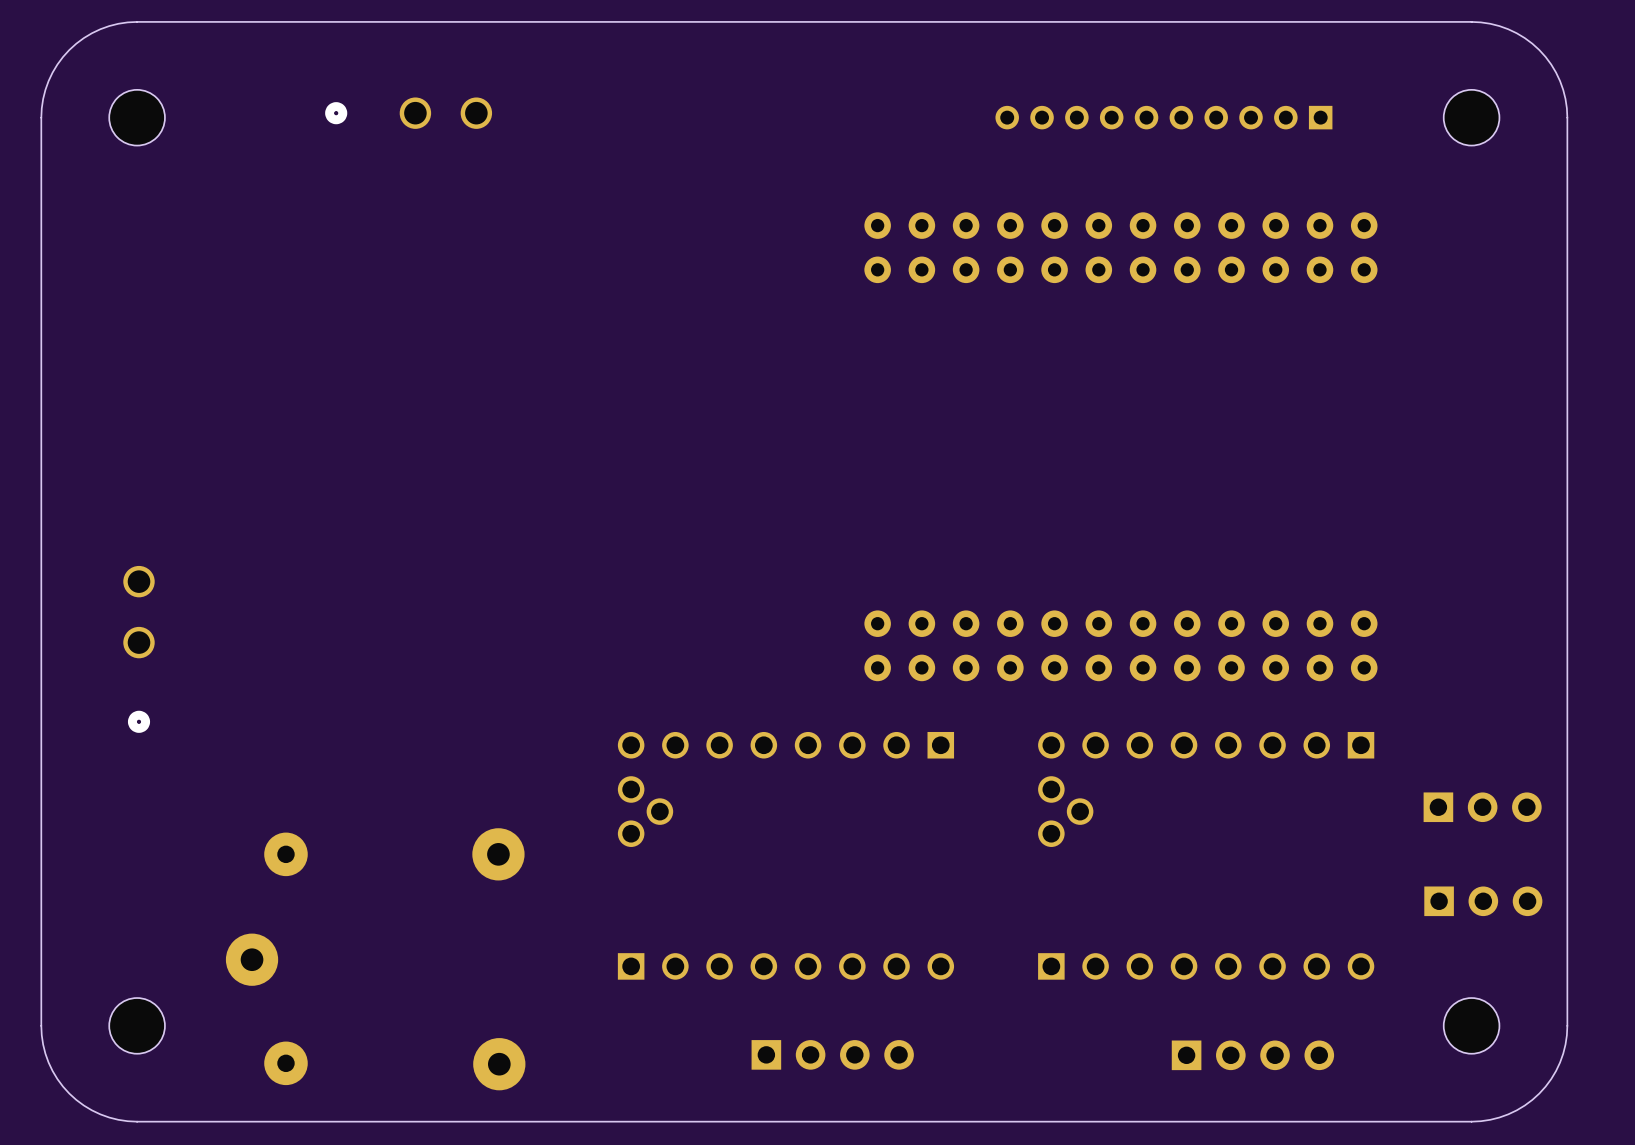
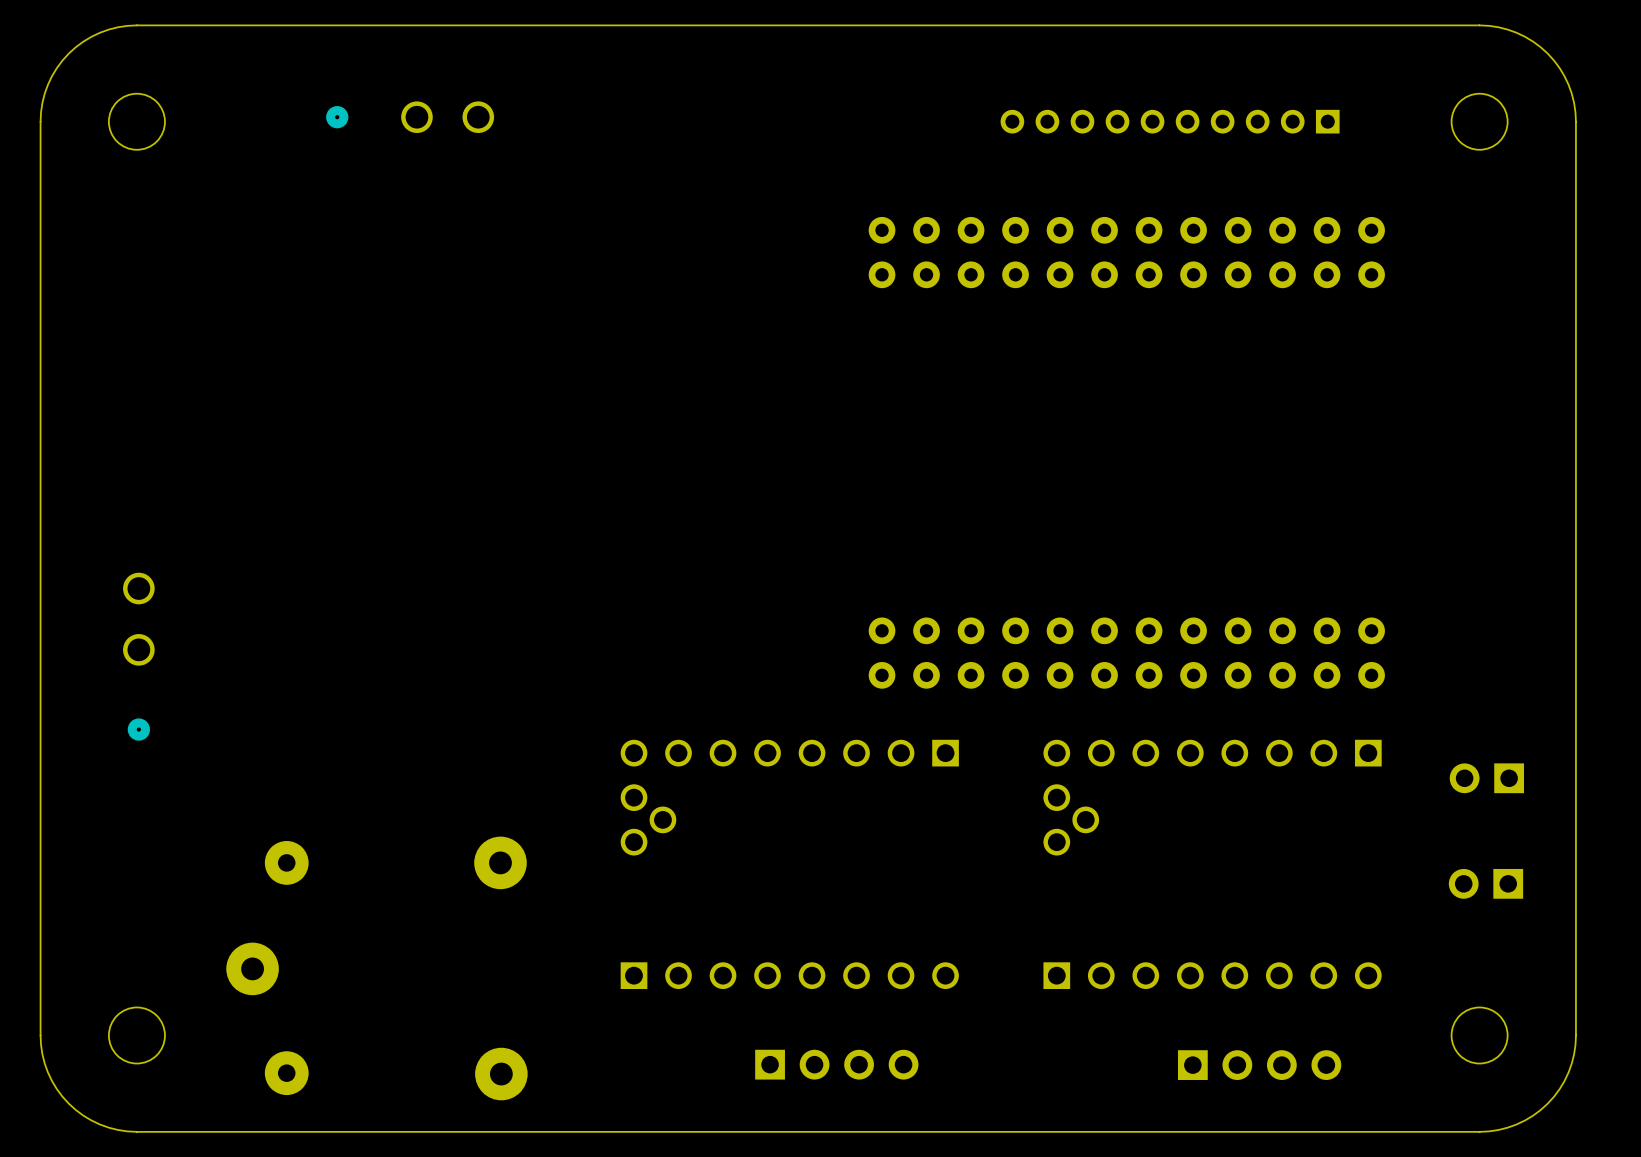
part: none -> (1486, 778)
part: (1482, 807) -> none
part: none -> (1485, 883)
part: (1483, 901) -> none

